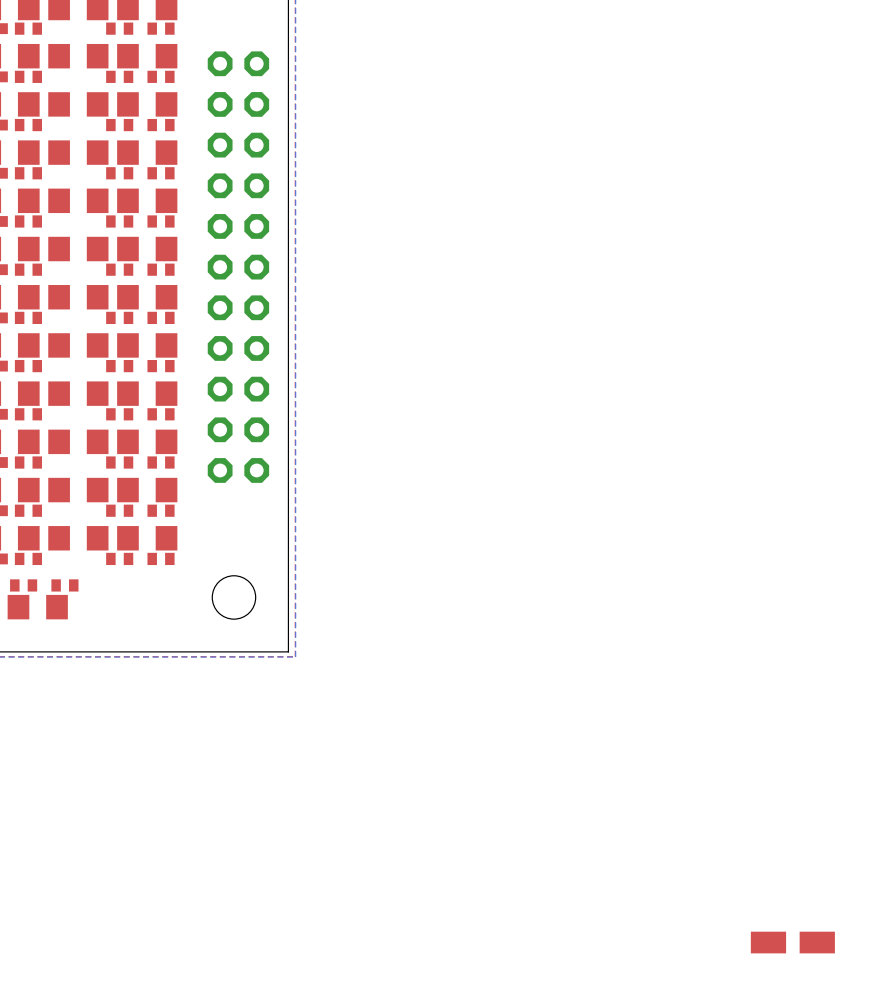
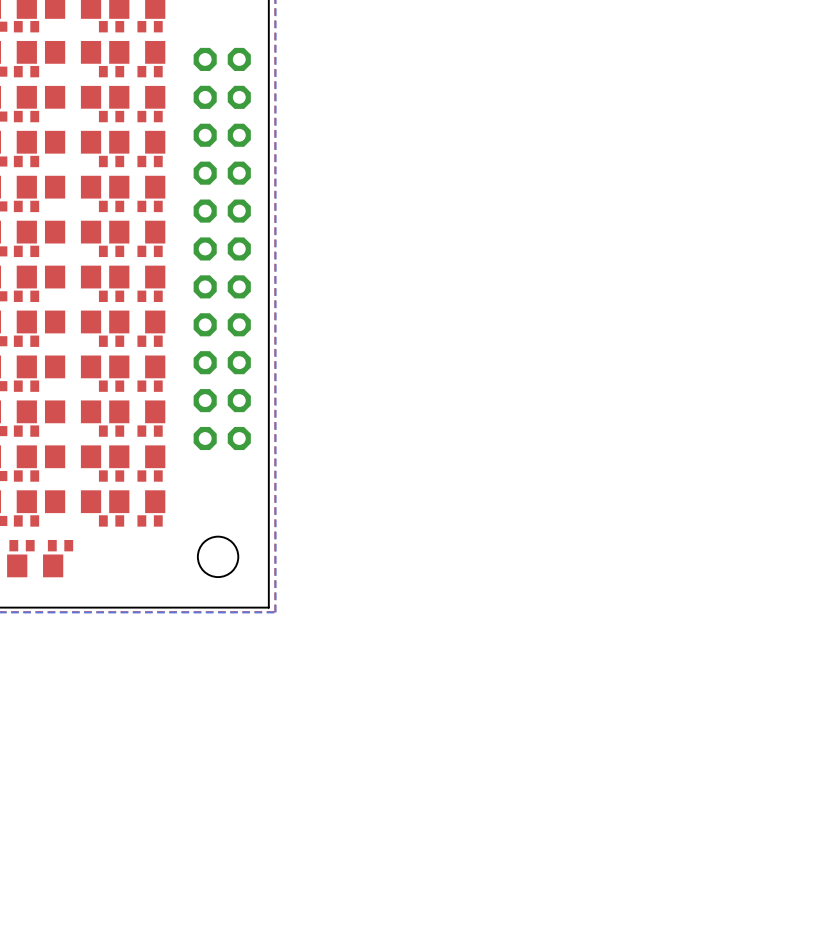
part: (792, 942) -> none

